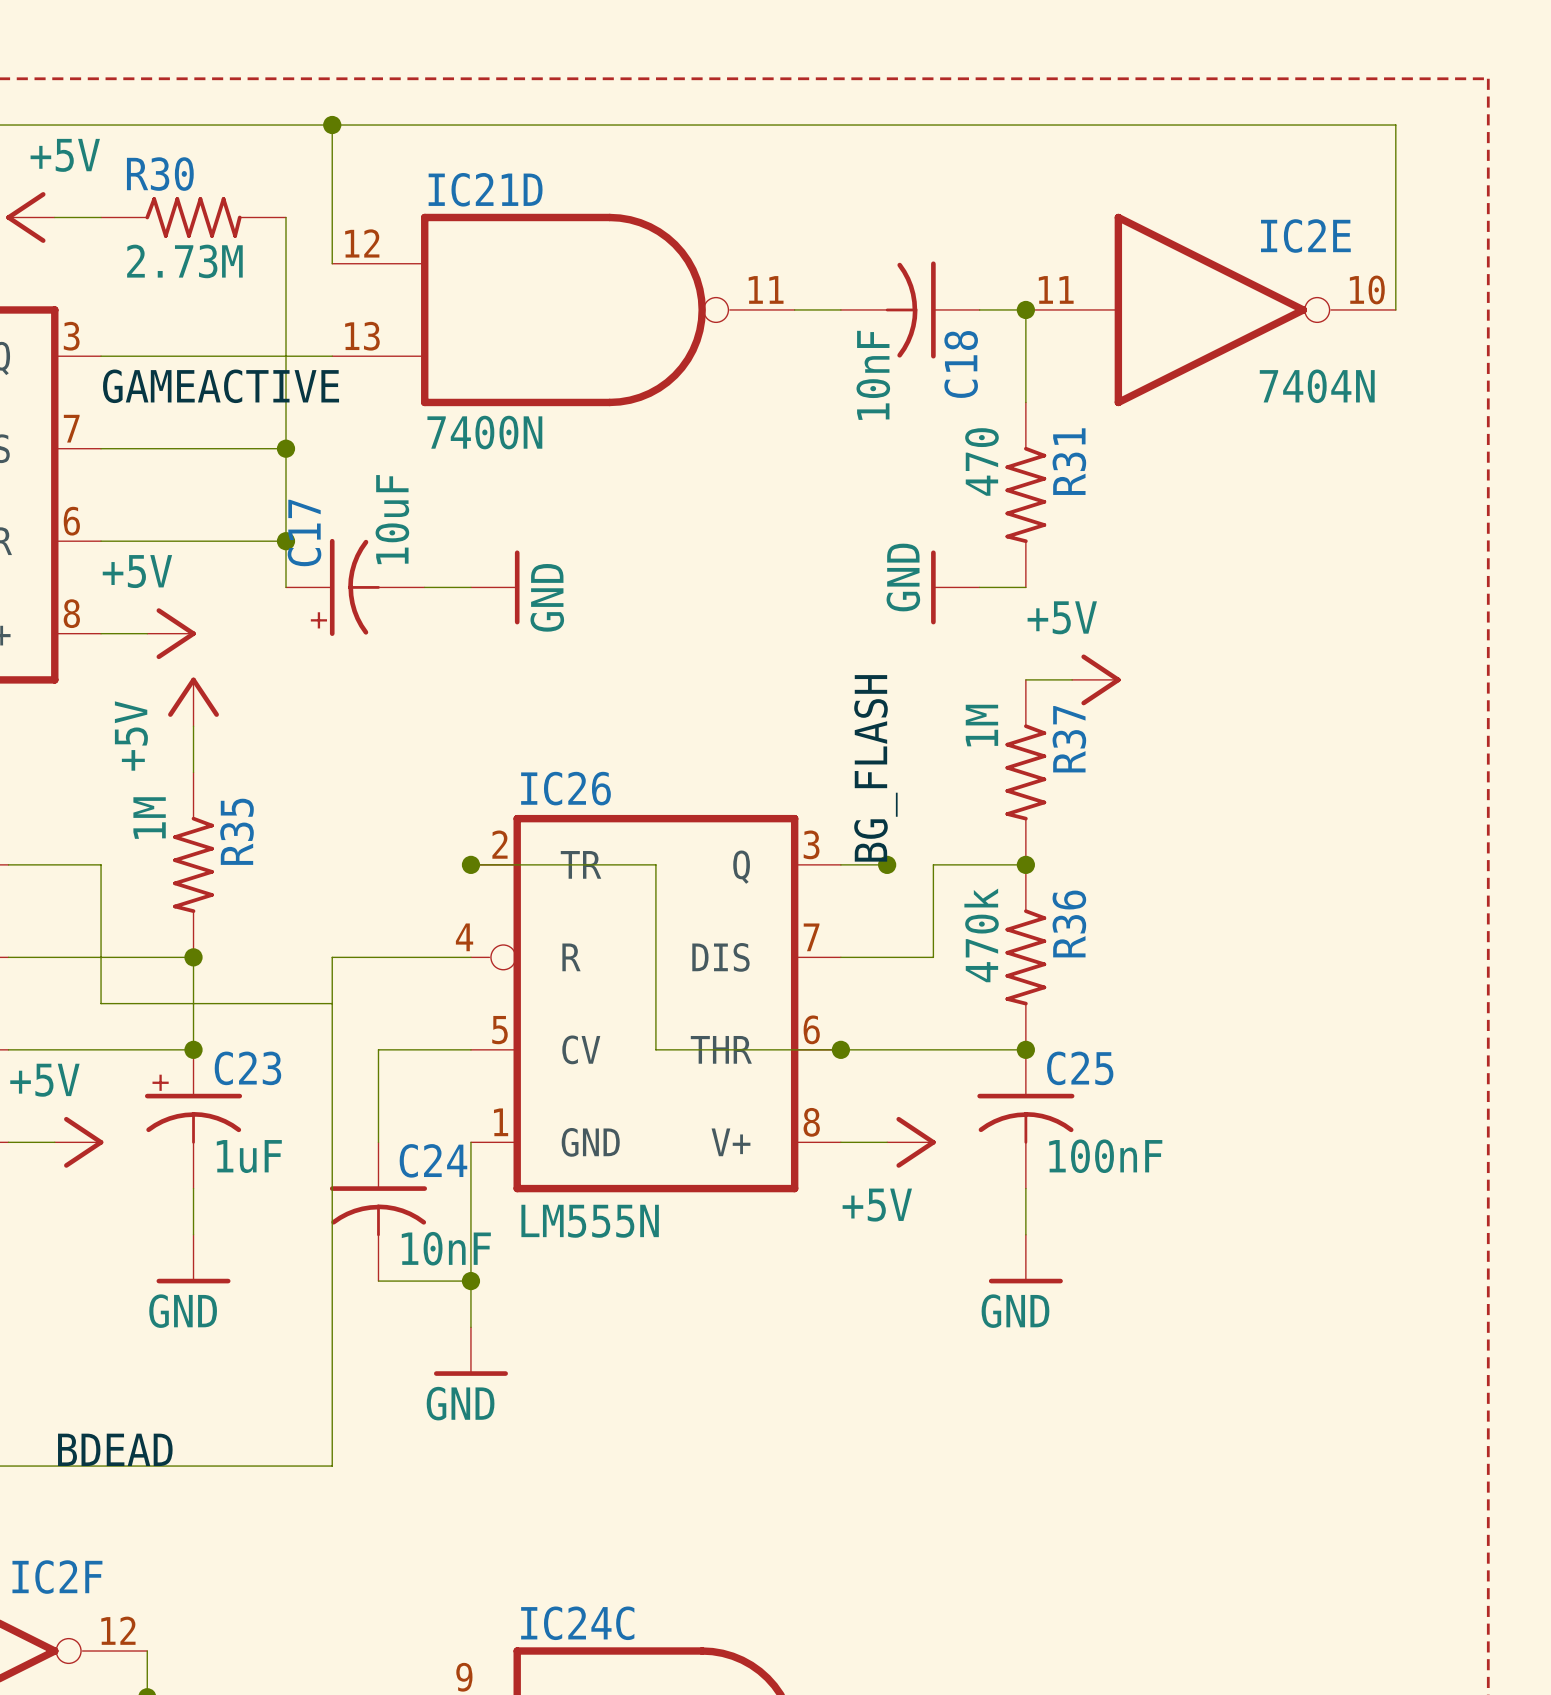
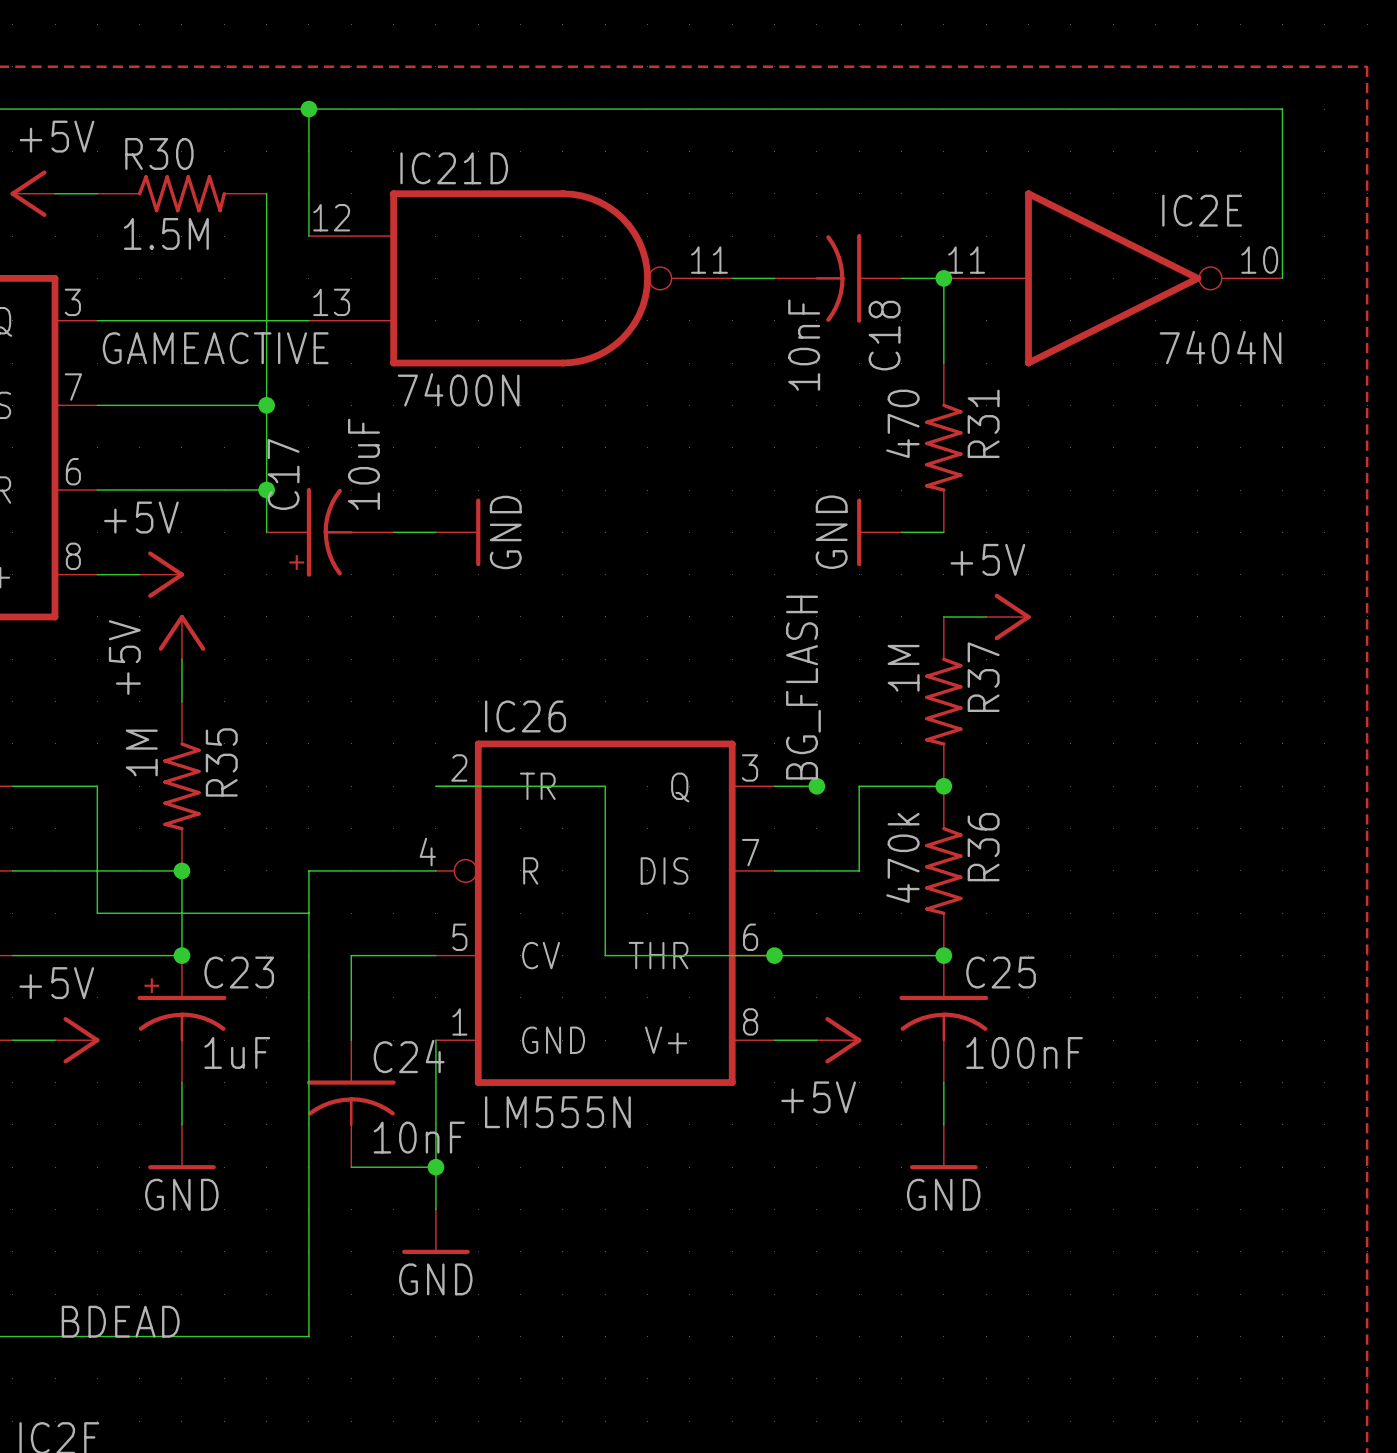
R30 value: 2.73M (184, 261) -> 1.5M (166, 233)
junction: (470, 864) -> none

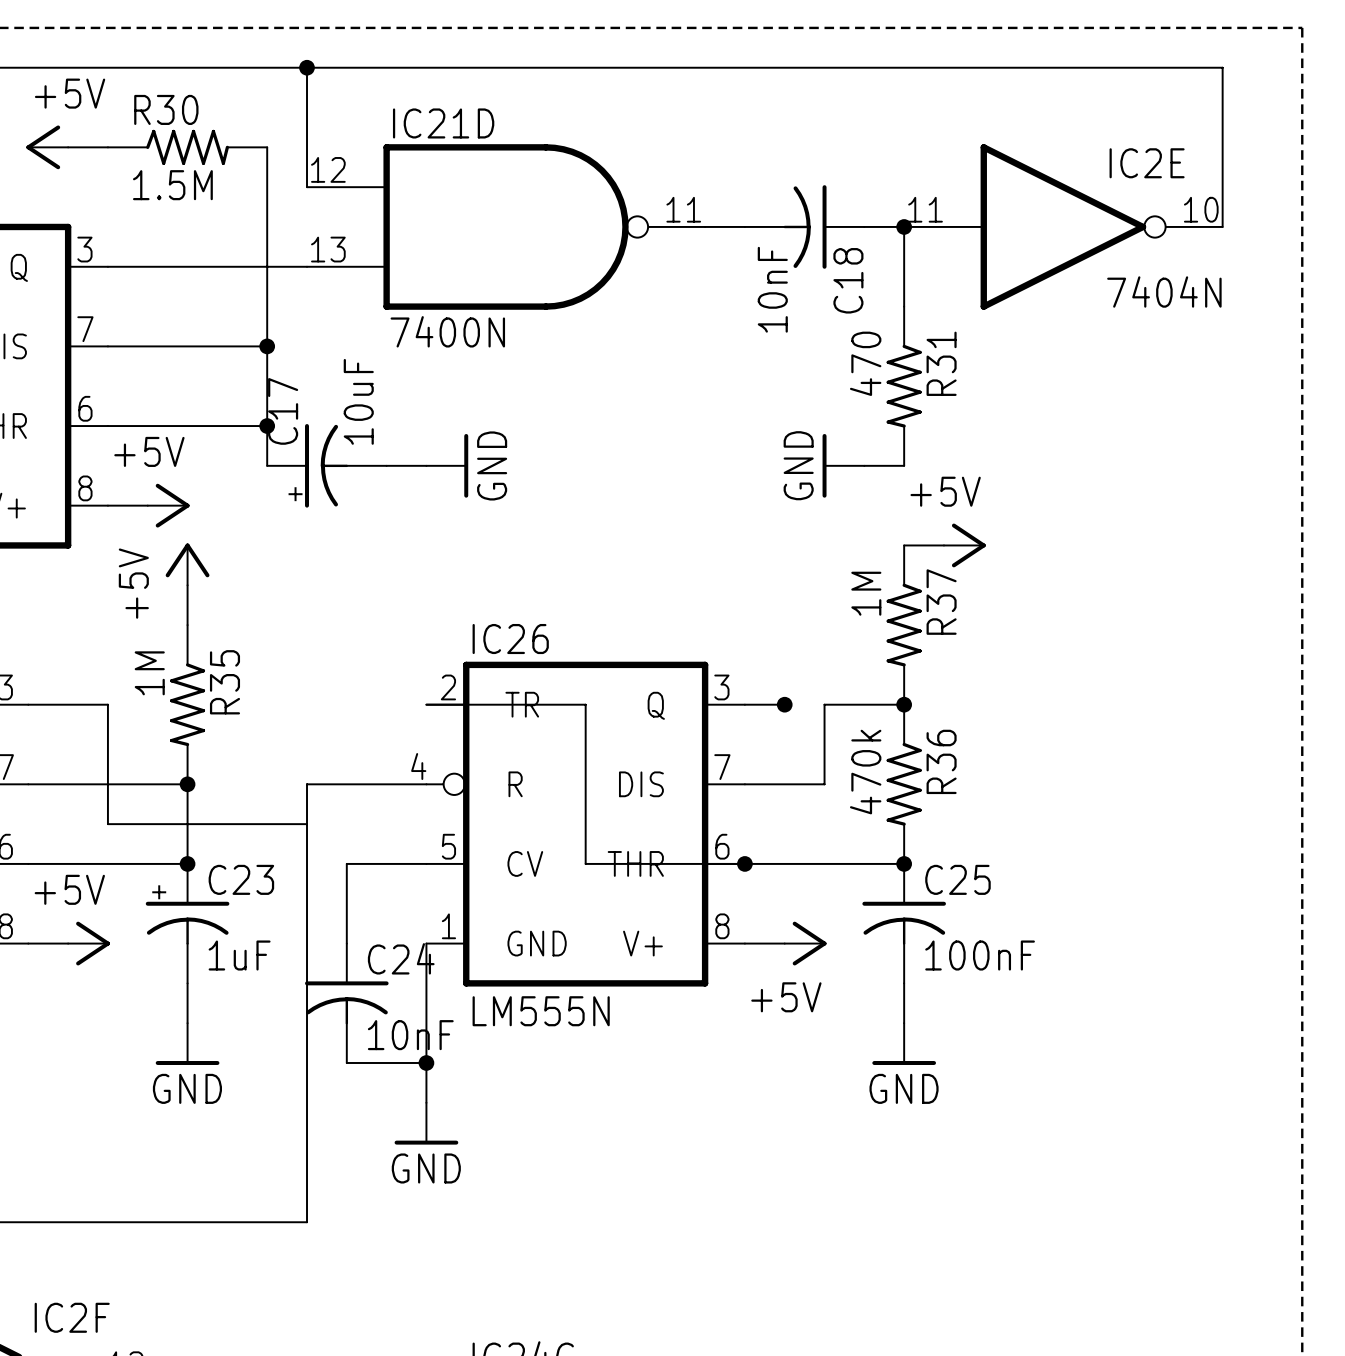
label: GAMEACTIVE (215, 348) -> none
label: BG_FLASH (803, 687) -> none
label: BDEAD (120, 1321) -> none

